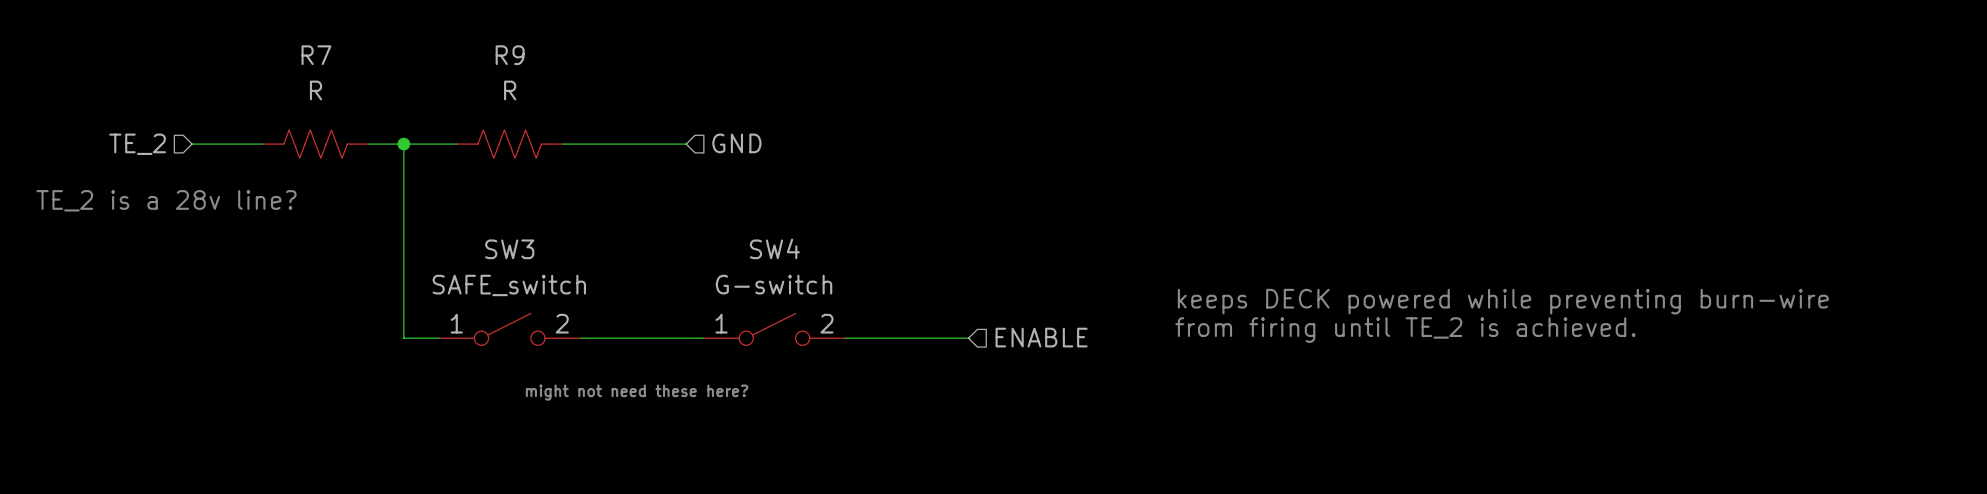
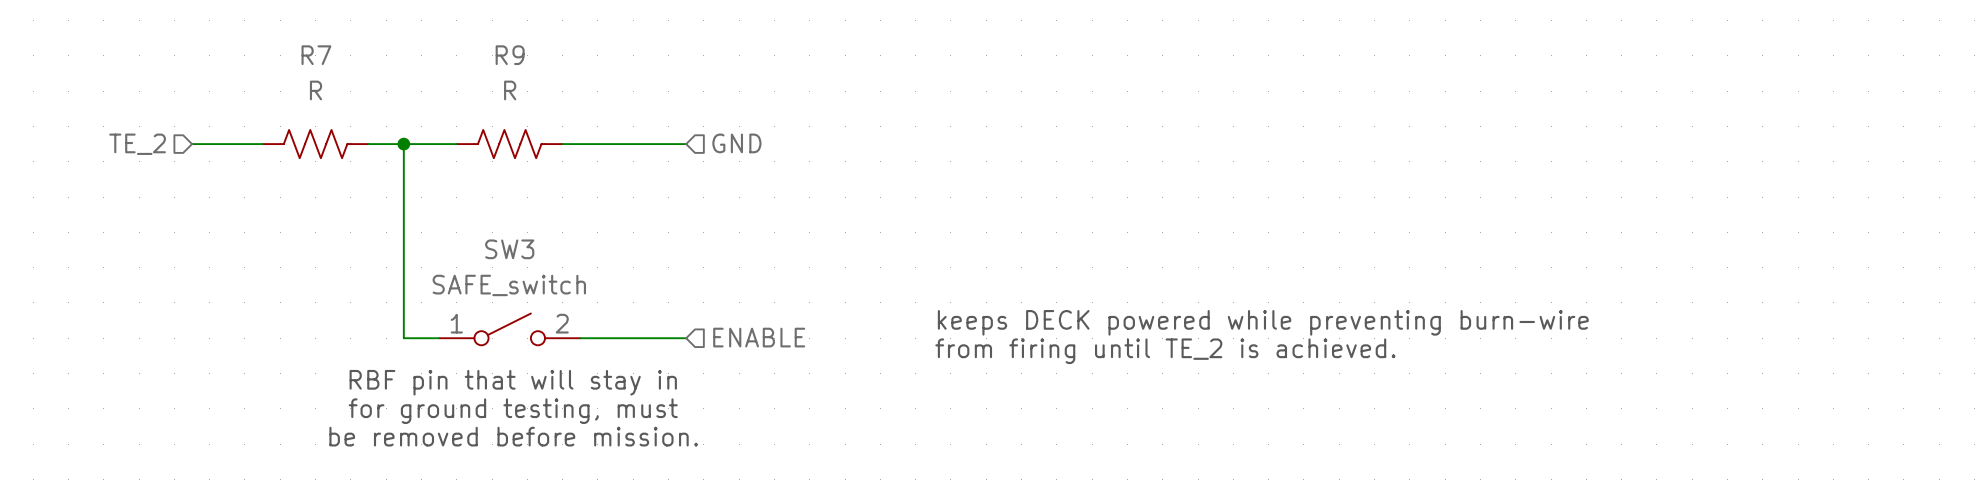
text: TE_2 is a 28v line? (166, 200) -> none
text position: keeps DECK powered while preventing burn-wire (1503, 301) -> keeps DECK powered while preventing burn-wire (1263, 322)
SW4: G-switch (774, 329) -> none
text position: from firing until TE_2 is achieved. (1405, 330) -> from firing until TE_2 is achieved. (1165, 351)
hierarchical label position: ENABLE (1041, 337) -> ENABLE (759, 337)
wire: (686, 338) (703, 338) -> none
wire: (845, 338) (968, 338) -> none
text: none -> RBF pin that will stay in (513, 382)
text: might not need these here? (637, 392) -> none
text: none -> for ground testing, must (513, 411)
text: none -> be removed before mission. (513, 436)

